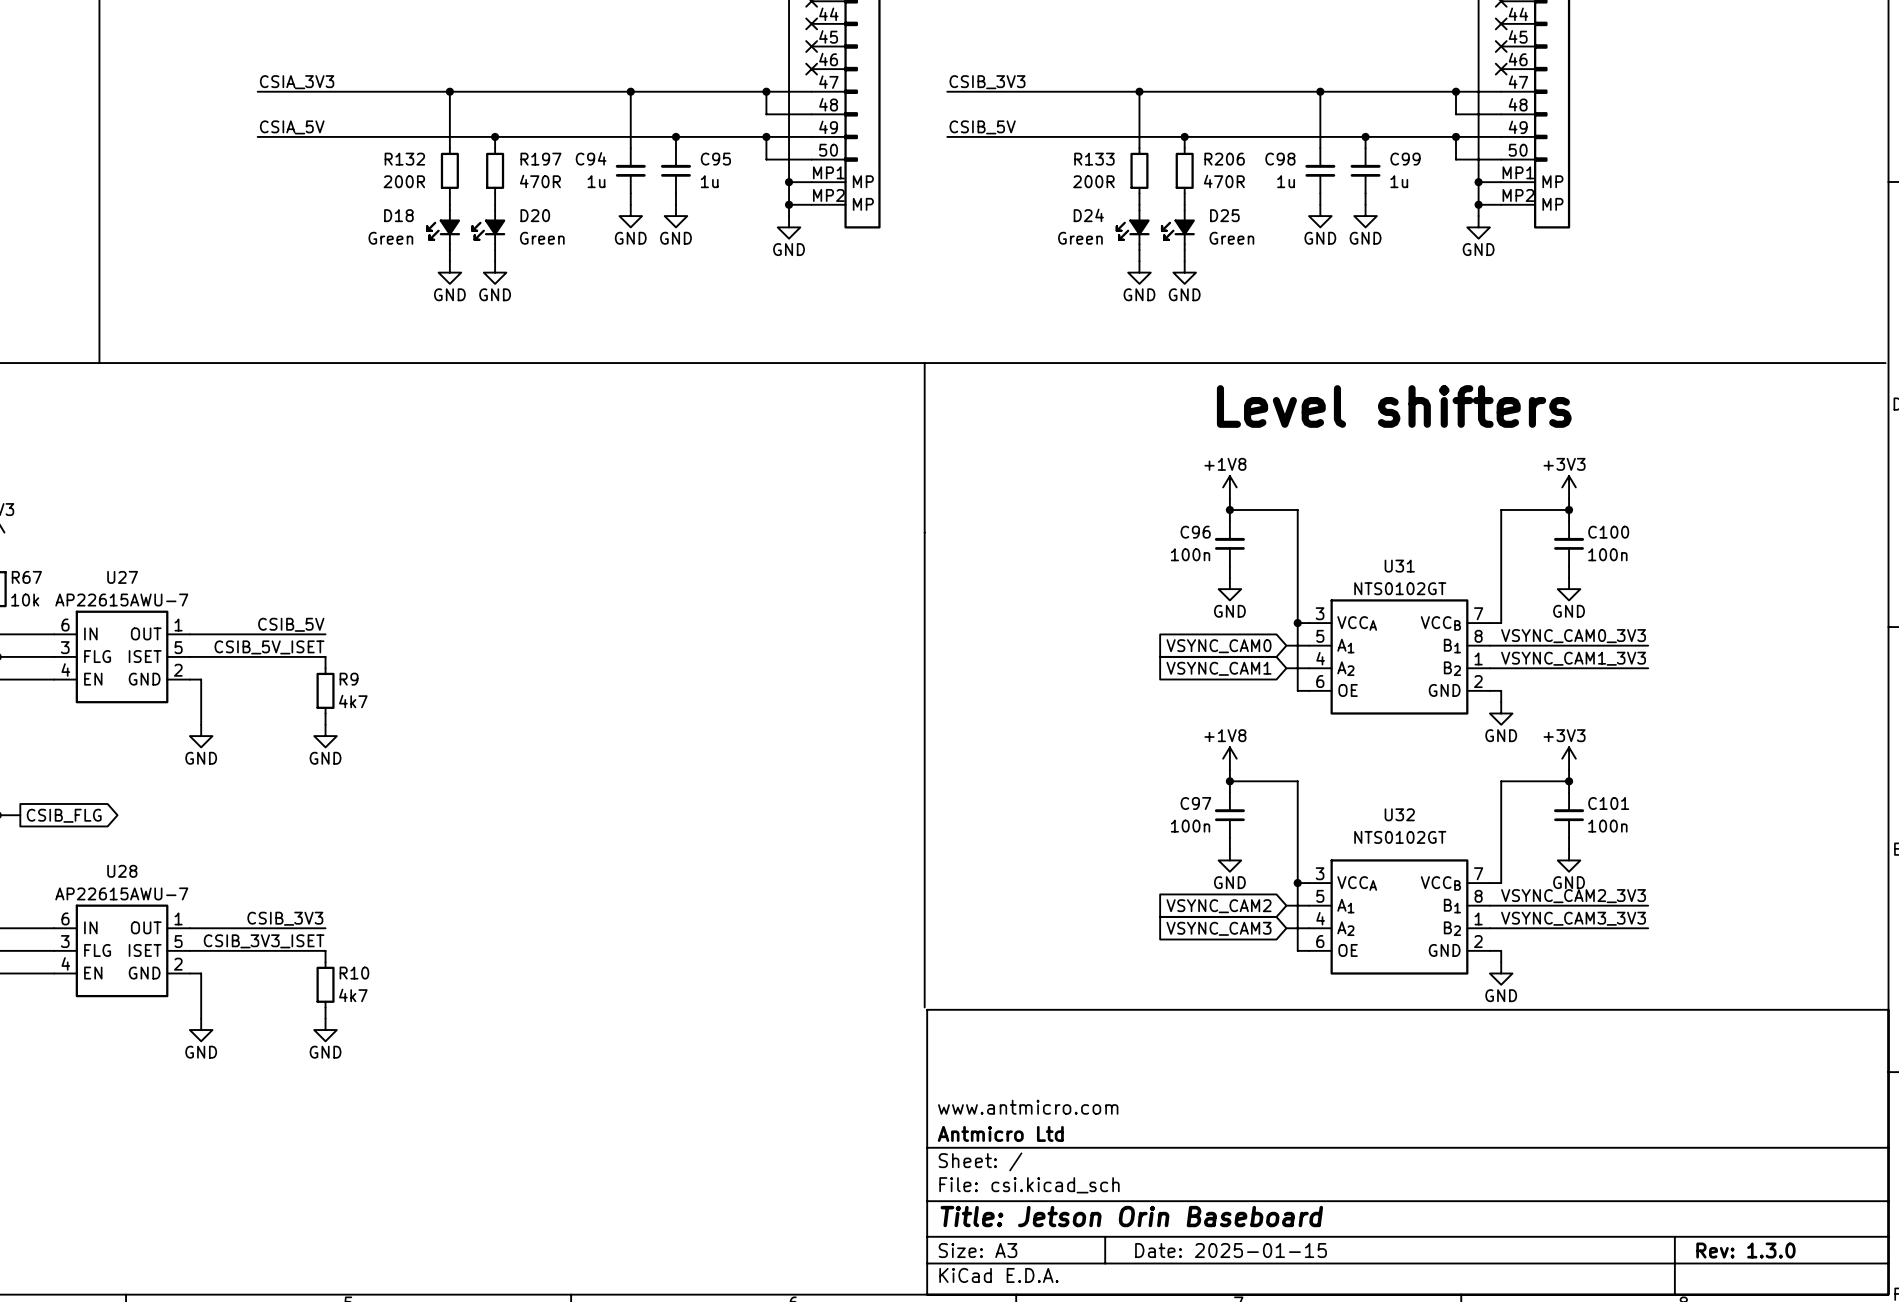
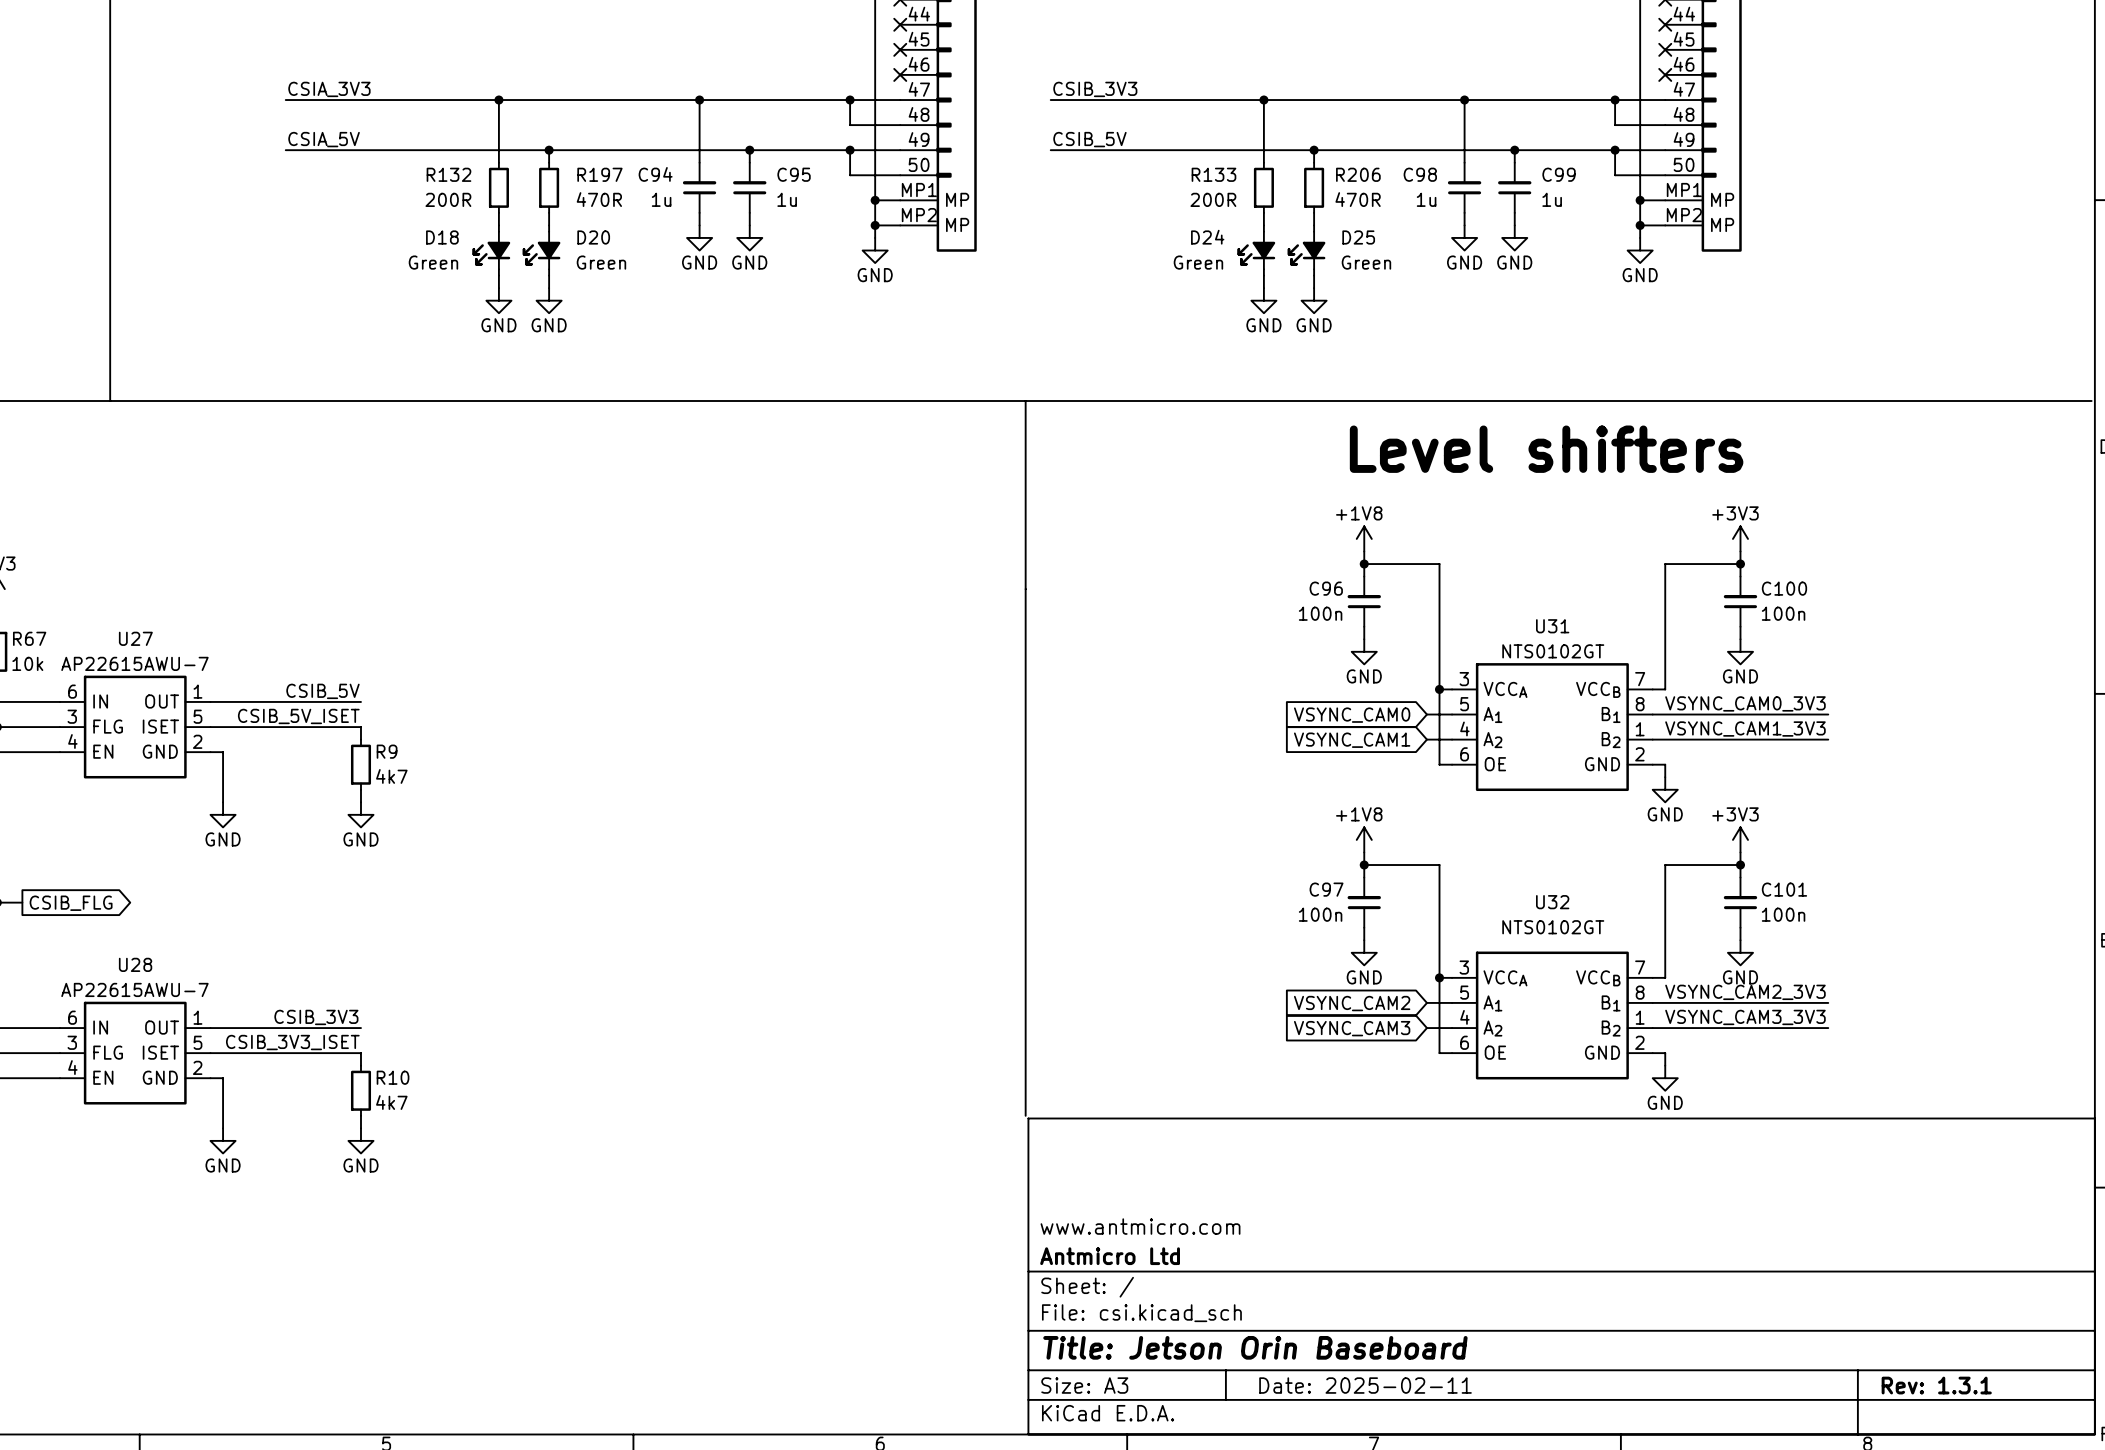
title block: Date: 2025-01-15 (1231, 1250) -> Date: 2025-02-11 (1365, 1385)
title block: Rev: 1.3.0 (1745, 1250) -> Rev: 1.3.1 (1936, 1385)

